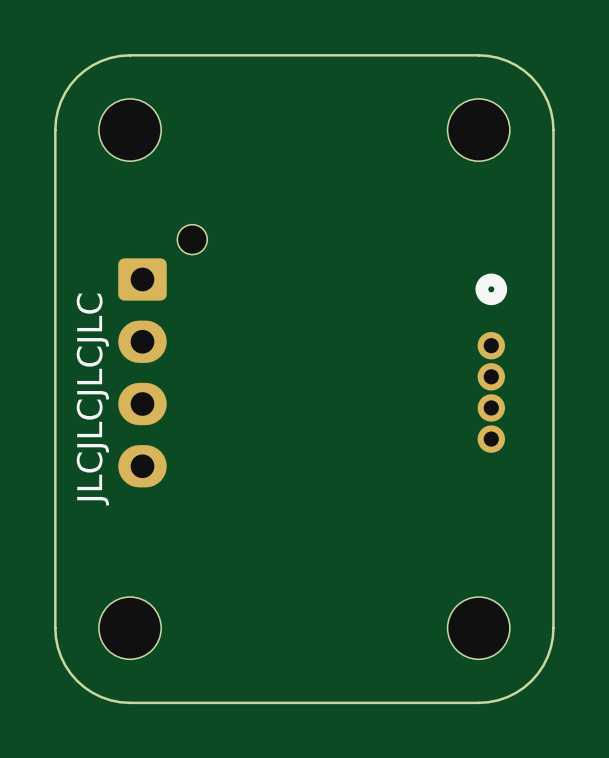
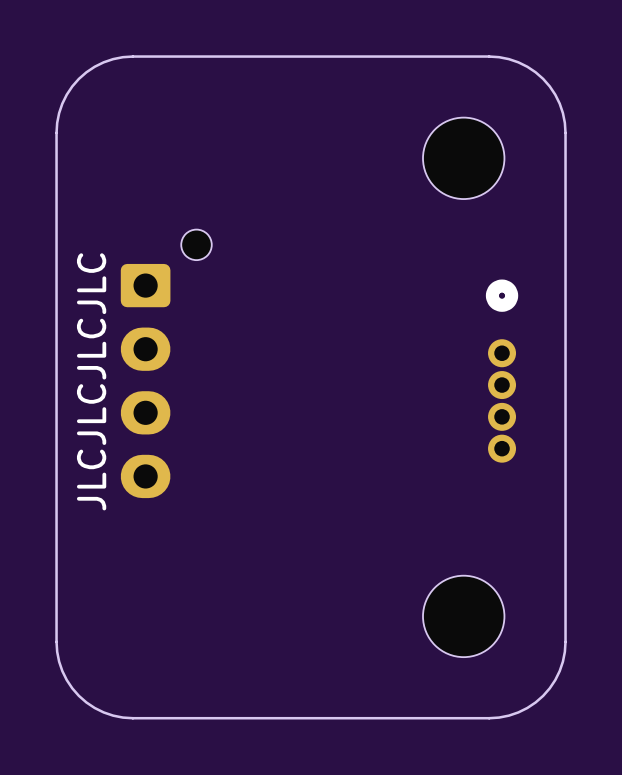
part: (130, 130) -> none
part: (478, 130) -> none
part: none -> (463, 158)
part: none -> (463, 616)
part: (130, 628) -> none
part: (478, 628) -> none

